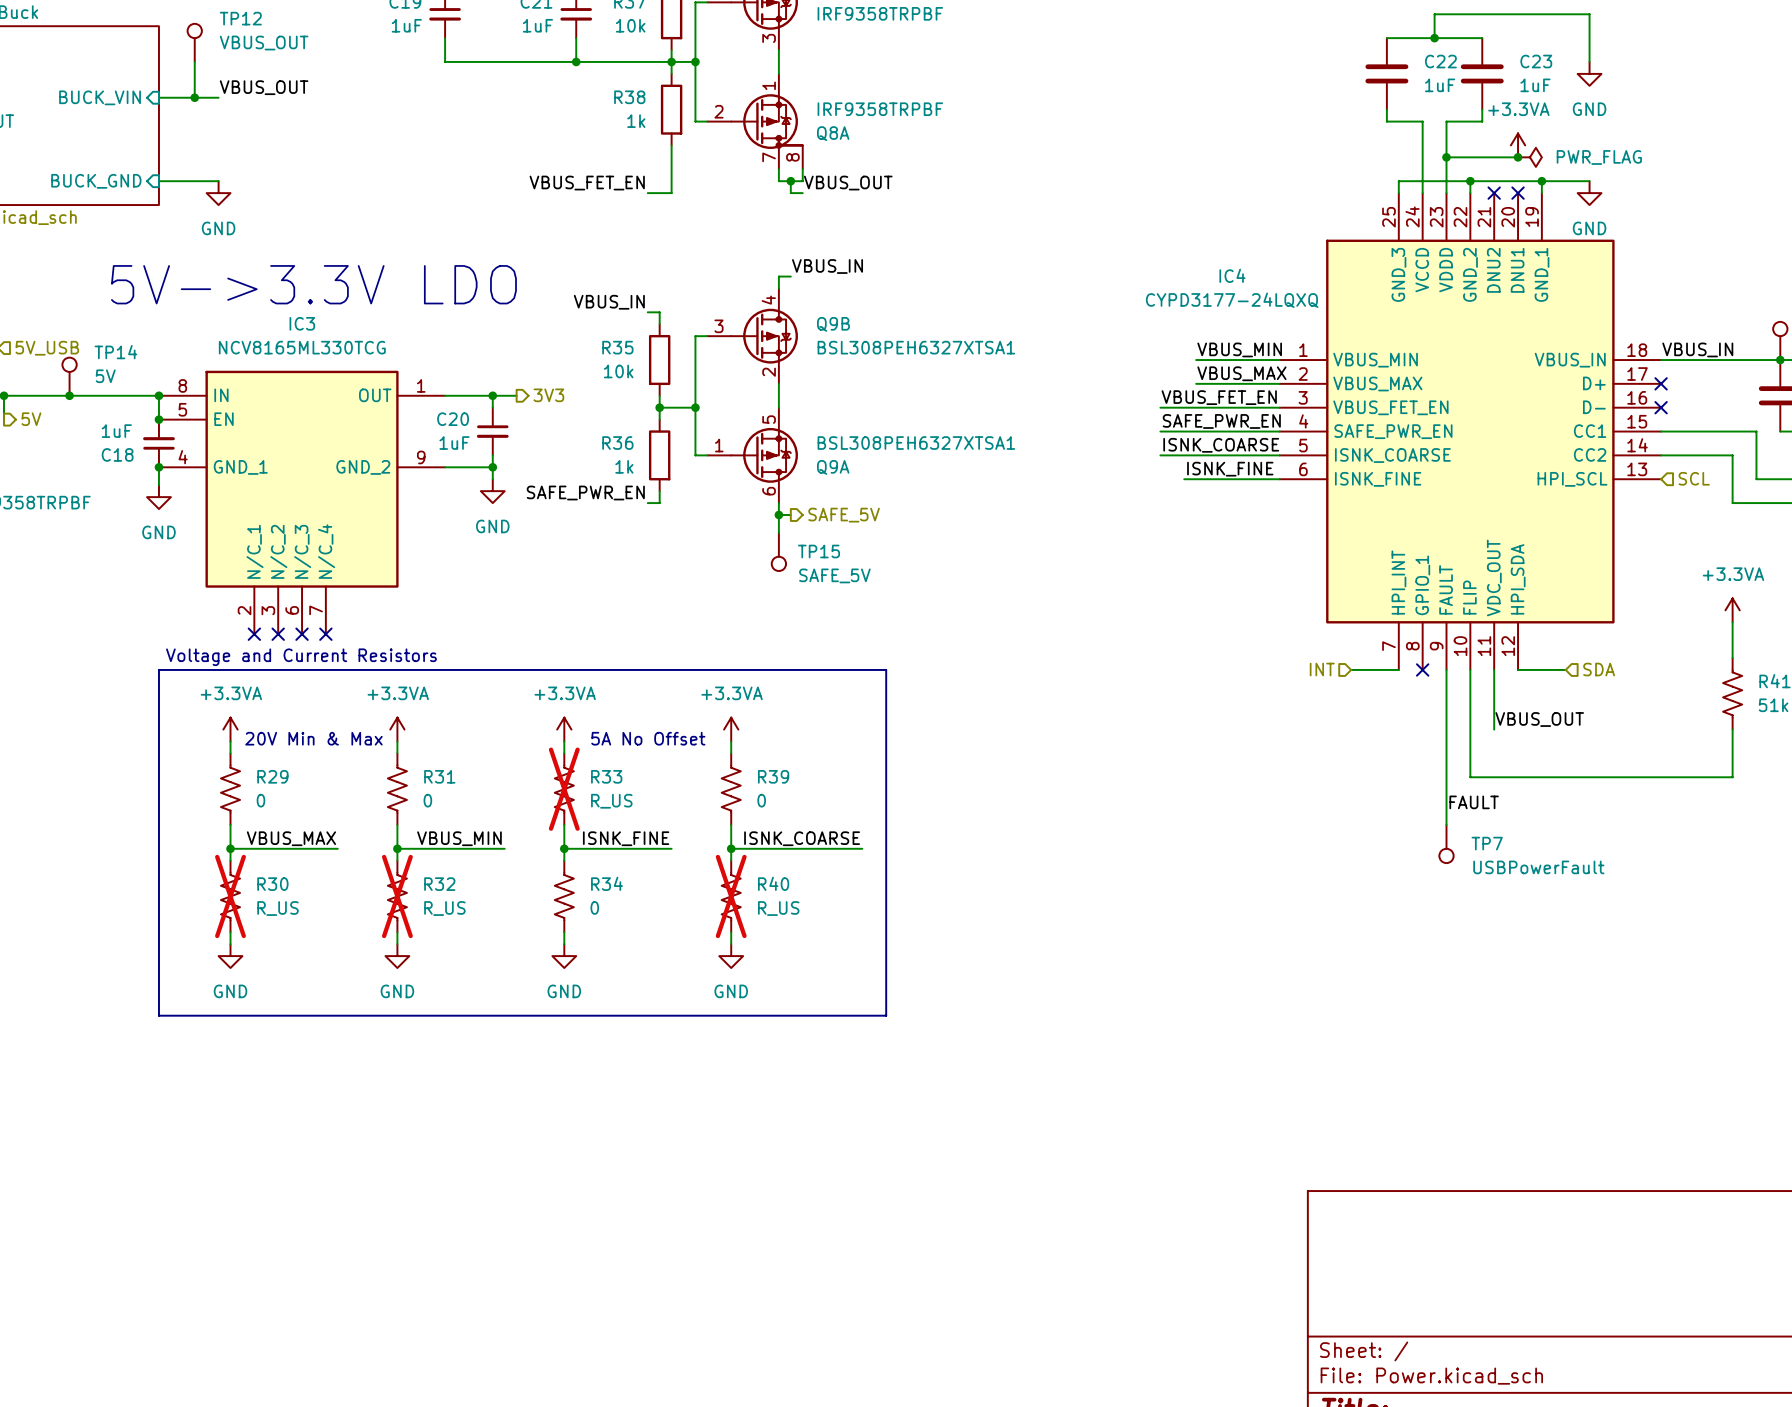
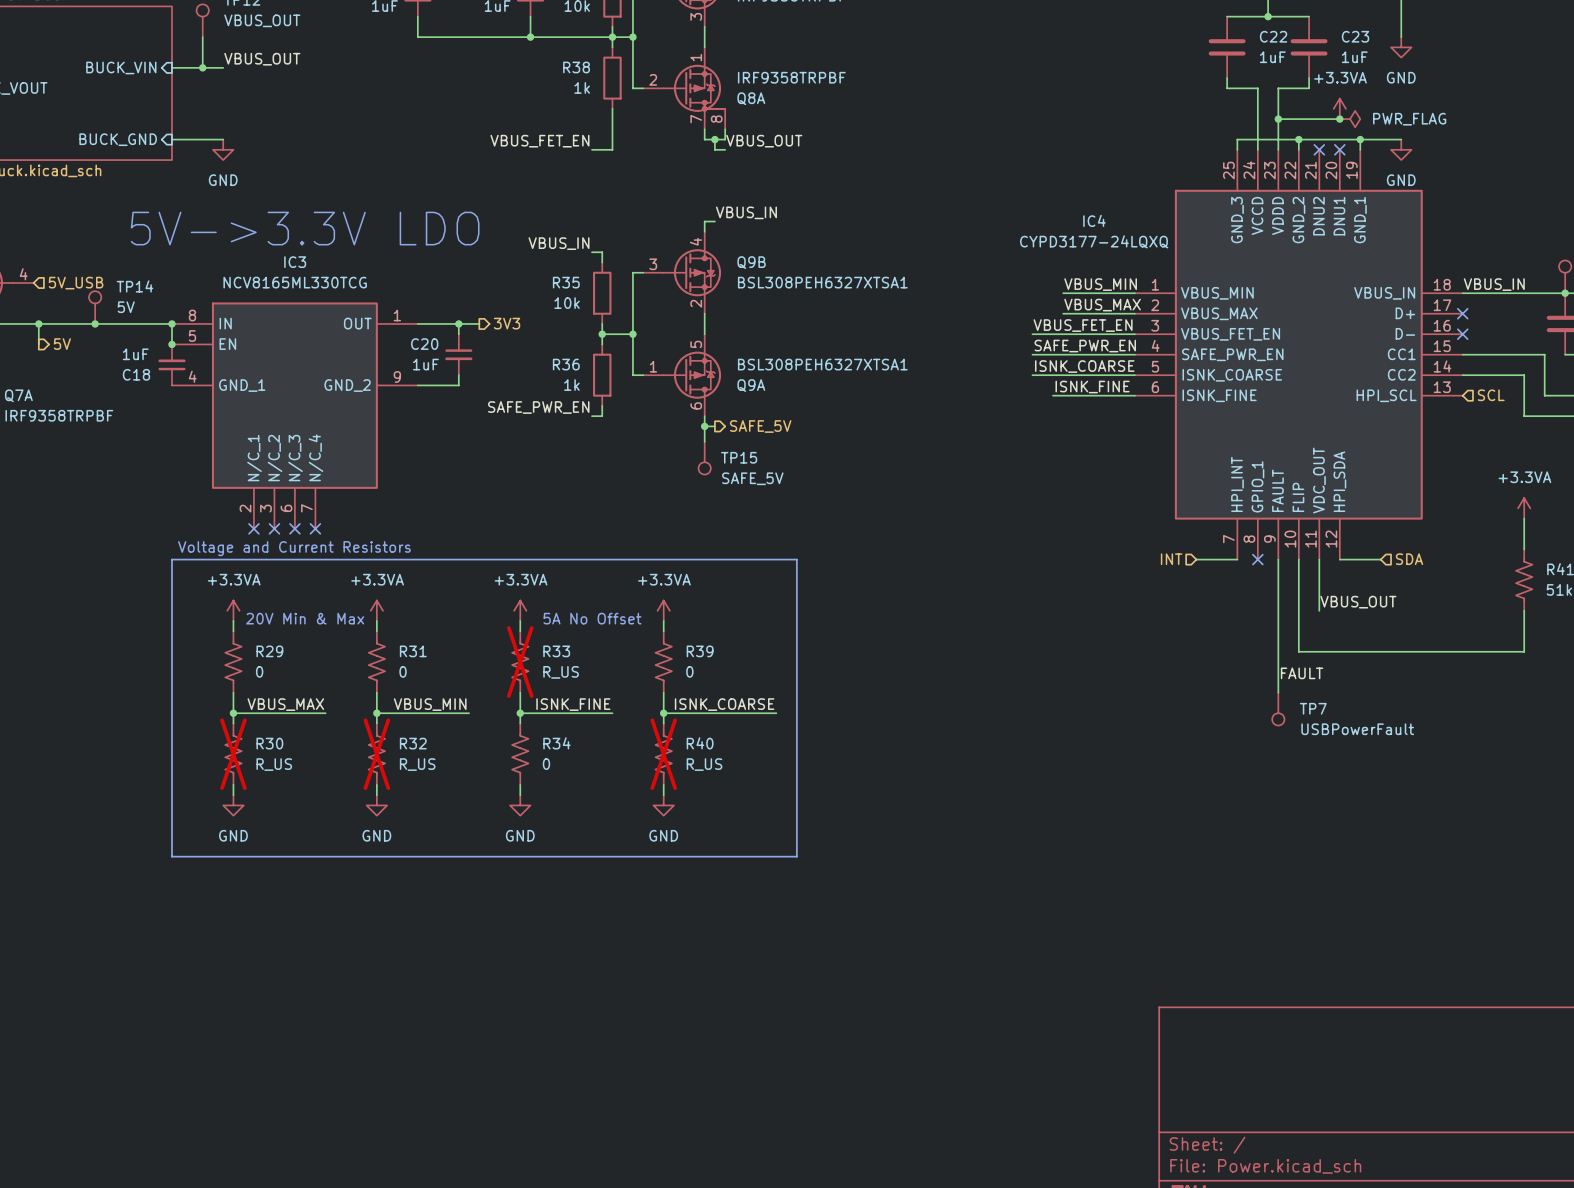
wire: (158, 467) (158, 485) -> none
junction: (158, 467) -> none
wire: (492, 467) (492, 479) -> none
junction: (492, 467) -> none
power symbol: GND (492, 491) -> none
power symbol: GND (158, 497) -> none

